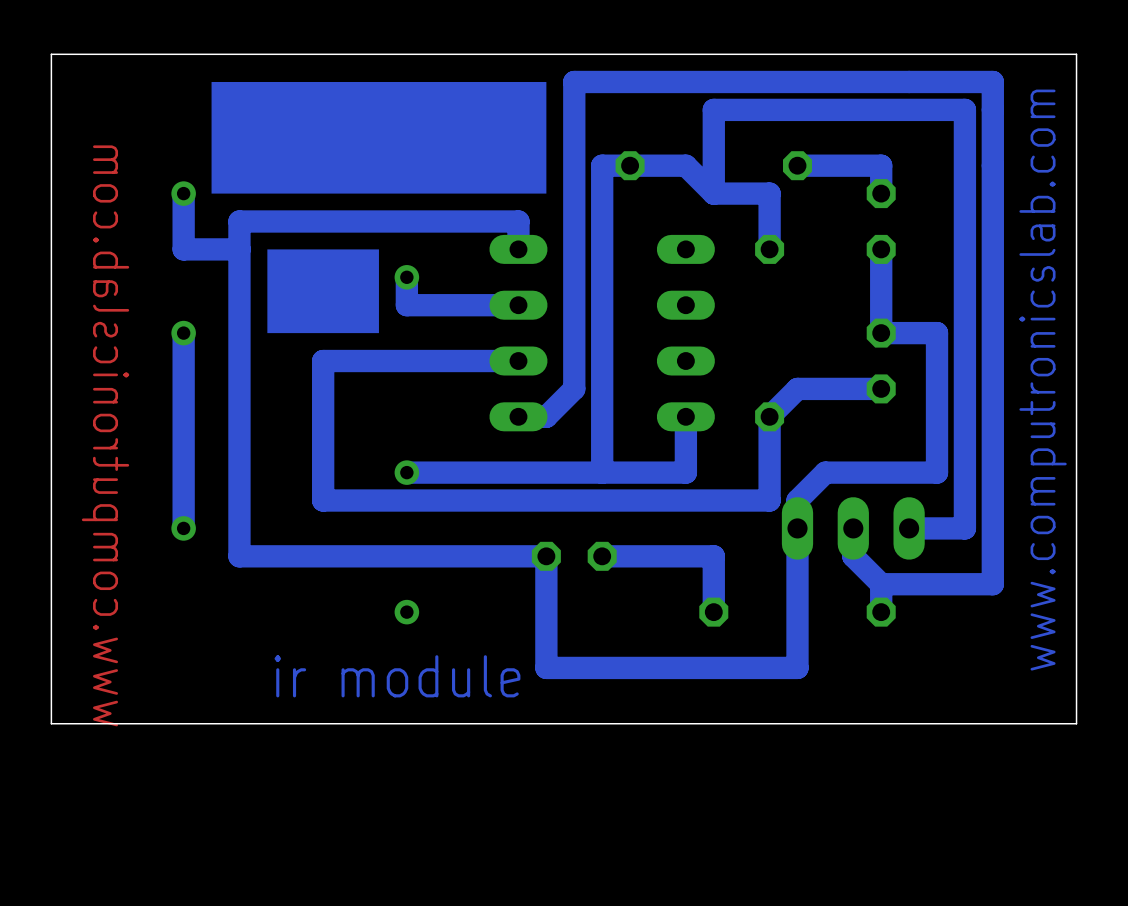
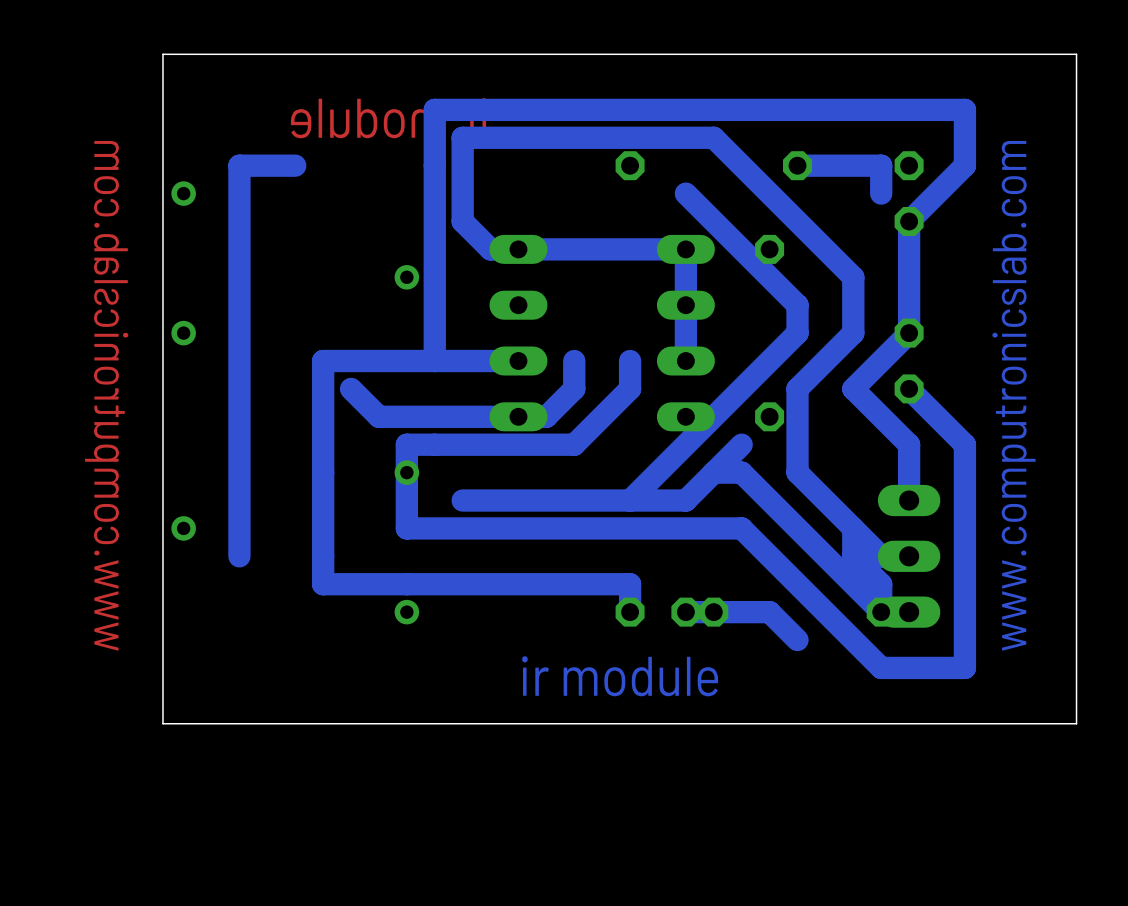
board edge: (162, 54) (51, 54) (51, 723) (162, 723) -> (162, 54) (162, 723)
drawing: [211, 81, 547, 194] -> none
bottom track: (713, 109) (713, 193) -> (713, 109) (434, 109) (434, 361)
bottom track: (964, 165) (964, 444) -> (964, 165) (909, 221) (909, 333) (853, 388) (909, 444) (909, 500)
bottom track: (183, 193) (183, 249) (239, 249) -> none
bottom track: none -> (685, 193) (797, 305) (797, 333) (630, 500)
bottom track: (713, 193) (685, 165) (602, 165) (602, 472) -> none
bottom track: (713, 193) (769, 193) (769, 249) -> none
bottom track: (239, 221) (518, 221) (518, 249) -> (239, 221) (239, 165) (295, 165)
part position: (881, 221) -> (909, 193)
drawing: [267, 249, 379, 334] -> none
bottom track: (881, 249) (881, 333) (937, 333) (937, 472) (825, 472) (797, 500) (797, 667) (546, 667) (546, 556) (239, 556) -> none
bottom track: (406, 277) (406, 305) (518, 305) -> none
bottom track: (183, 333) (183, 528) -> none
bottom track: (574, 361) (574, 81) (992, 81) (992, 584) (881, 584) -> none
bottom track: none -> (685, 361) (685, 249) (490, 249) (462, 221) (462, 137) (713, 137) (853, 277) (853, 333) (797, 388) (797, 472) (881, 556) (909, 556)
part position: (881, 361) -> (909, 361)
text position: www.computronicslab.com (1043, 380) -> www.computronicslab.com (1013, 395)
bottom track: none -> (351, 388) (378, 416) (518, 416)
bottom track: (881, 388) (797, 388) (769, 416) (769, 500) (685, 500) -> (741, 444) (685, 500)
bottom track: none -> (909, 388) (964, 444)
bottom track: (685, 416) (685, 472) (406, 472) -> none
bottom track: none -> (713, 472) (741, 472) (881, 612) (909, 612)
bottom track: (462, 500) (323, 500) -> (630, 612) (630, 584) (323, 584) (323, 500)
part rotation: 0° (853, 528) -> 90° clockwise (909, 556)
bottom track: (964, 528) (909, 528) -> (964, 528) (964, 667) (881, 667) (741, 528) (406, 528) (406, 444) (574, 444) (630, 388) (630, 361)
part position: (574, 556) -> (657, 612)
bottom track: (602, 556) (713, 556) (713, 612) -> none
bottom track: none -> (685, 612) (769, 612) (797, 640)
text position: ir module (397, 676) -> ir module (620, 676)

